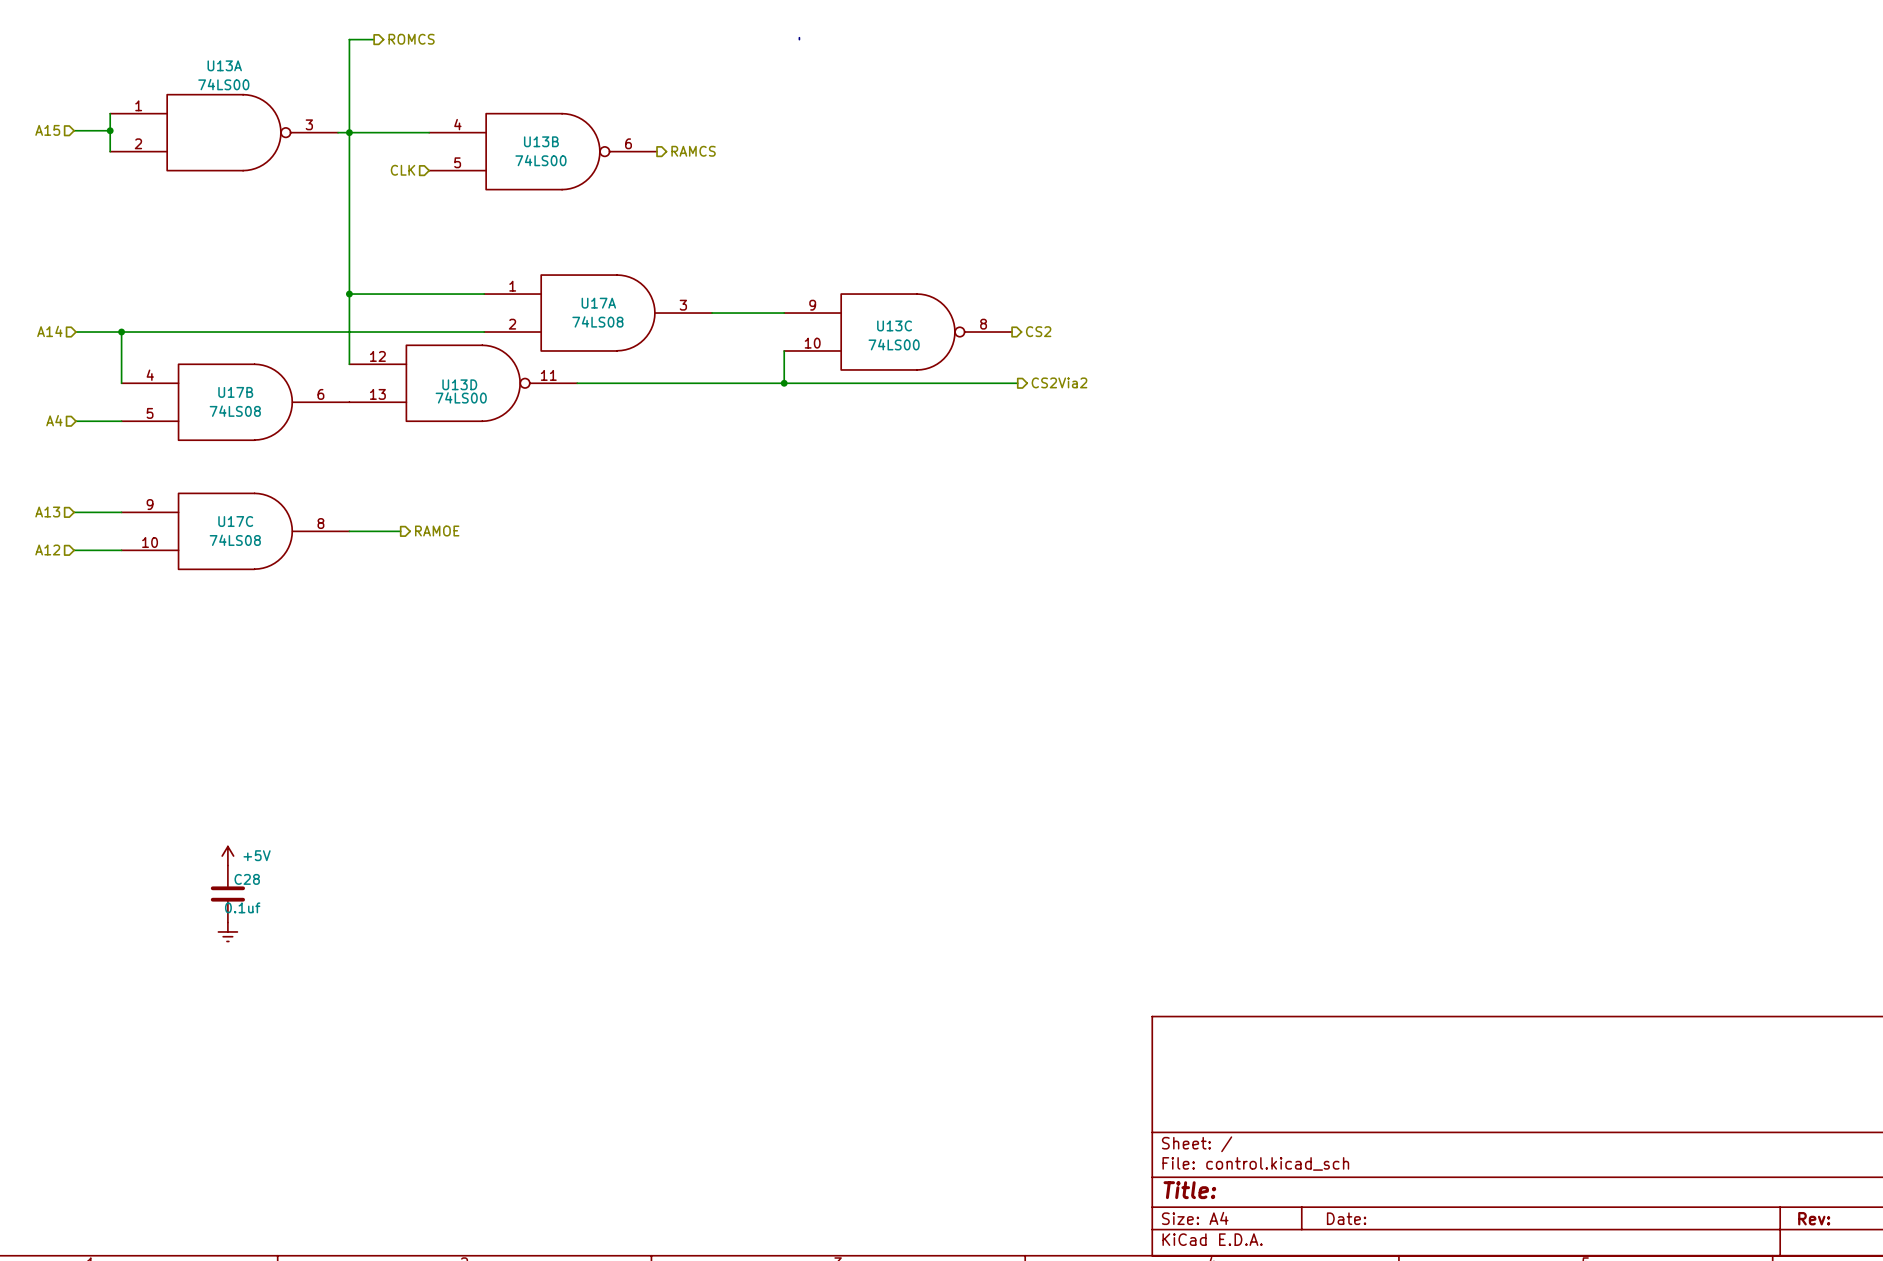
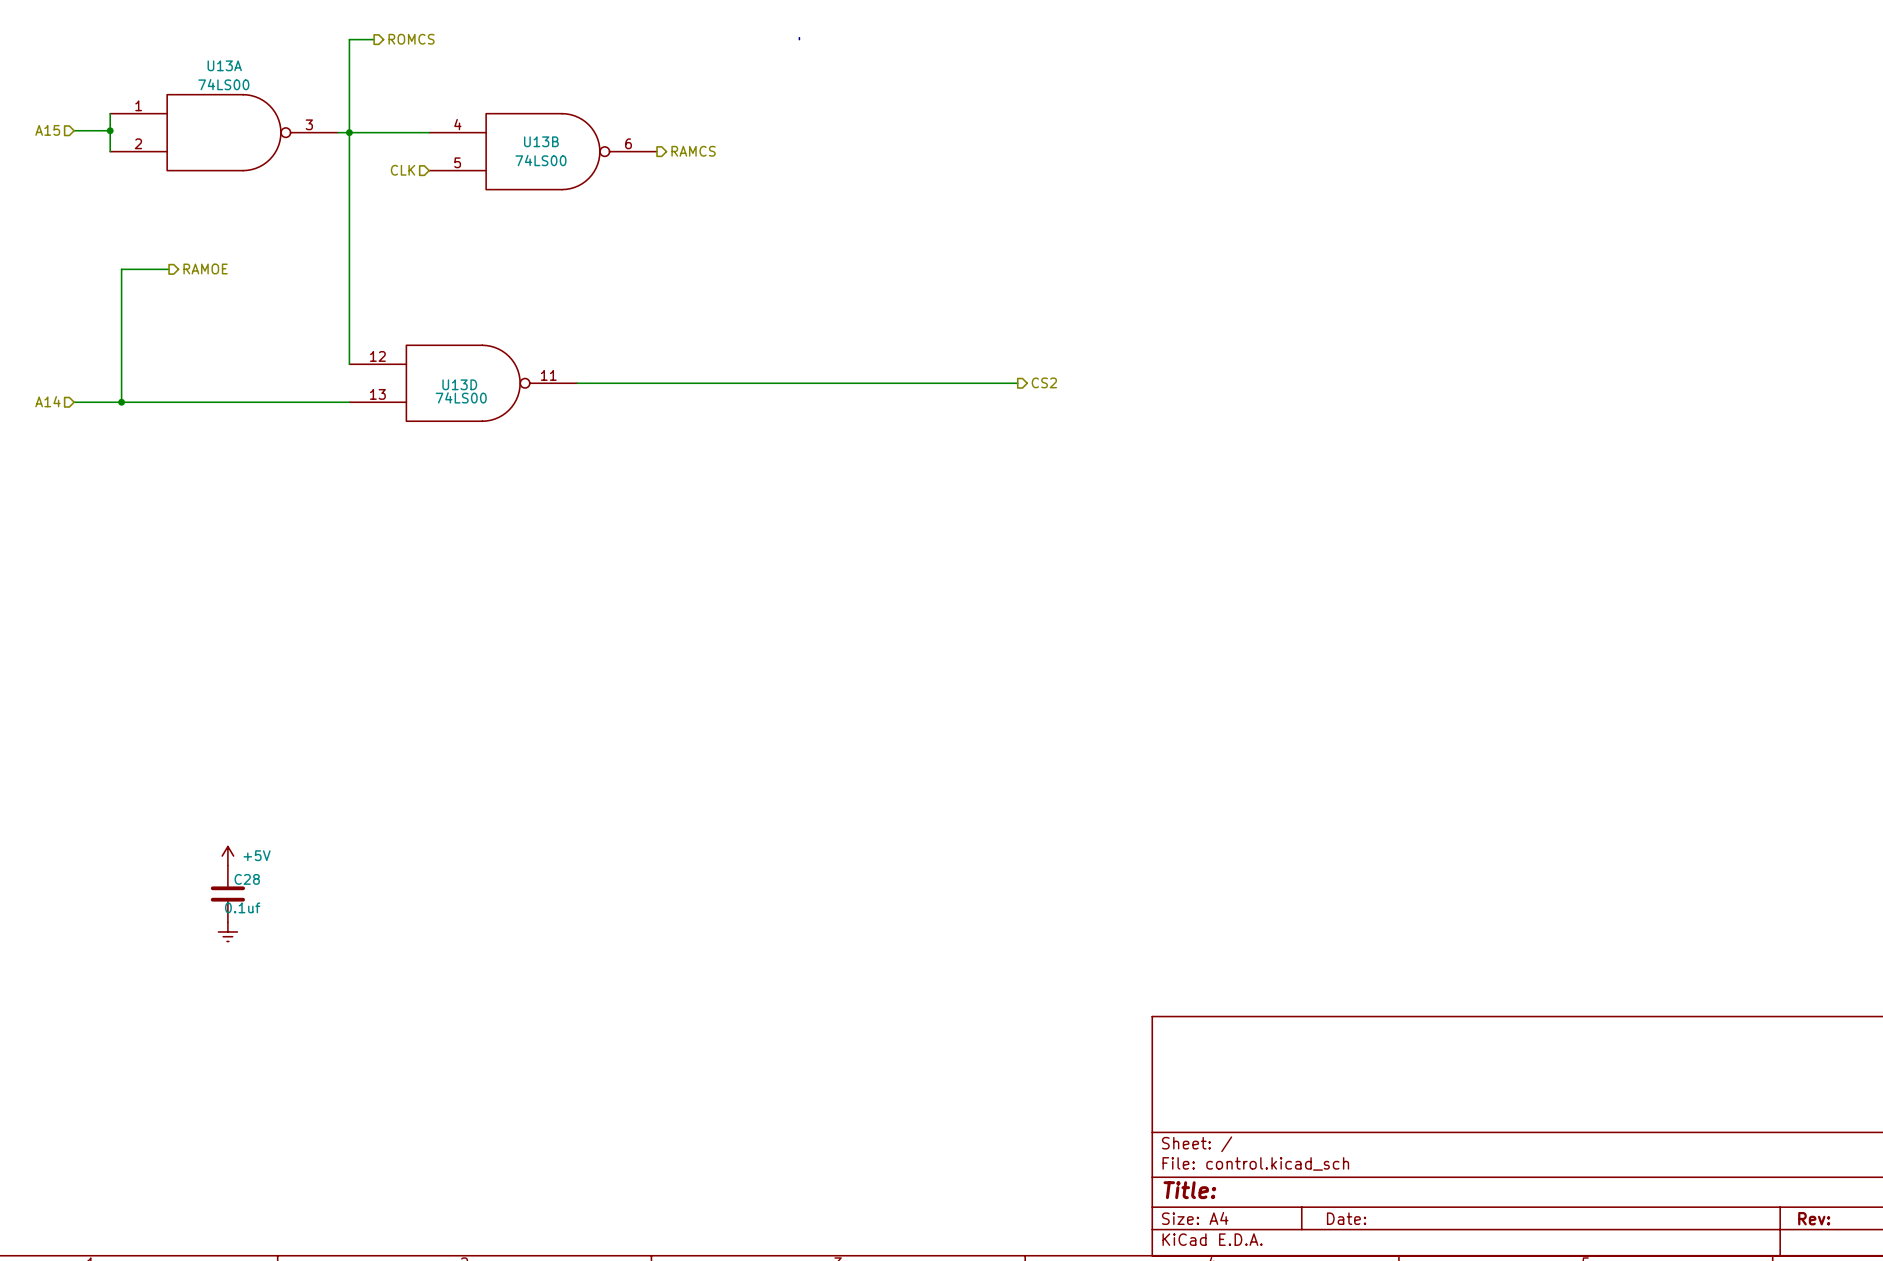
hierarchical label: none -> RAMOE (205, 268)
wire: none -> (169, 269) (121, 269) (121, 332)
wire: (349, 294) (484, 294) -> none
junction: (349, 294) -> none
U17A: 74LS08 (598, 313) -> none
wire: (712, 313) (784, 313) -> none
hierarchical label position: A14 (49, 331) -> A14 (47, 401)
hierarchical label: CS2 (1038, 331) -> none
wire: (76, 332) (484, 332) -> none
junction: (121, 332) -> none
U13C: 74LS00 (898, 332) -> none
wire: (784, 350) (784, 383) -> none
hierarchical label: CS2Via2 (1059, 382) -> CS2 (1044, 382)
wire: none -> (121, 383) (121, 402)
junction: (784, 383) -> none
wire: none -> (74, 402) (349, 402)
junction: none -> (121, 402)
U17B: 74LS08 (235, 402) -> none
hierarchical label: A4 (54, 420) -> none
wire: (76, 421) (121, 421) -> none
hierarchical label: A13 (47, 512) -> none
wire: (74, 512) (121, 512) -> none
U17C: 74LS08 (235, 531) -> none
wire: (349, 531) (400, 531) -> none
hierarchical label: RAMOE (437, 531) -> none
hierarchical label: A12 (47, 549) -> none
wire: (74, 550) (121, 550) -> none

